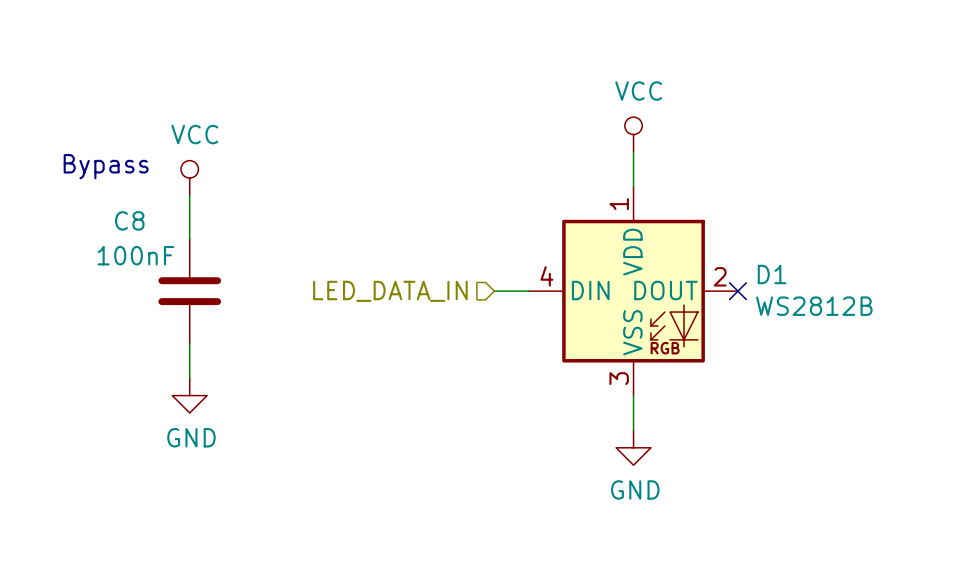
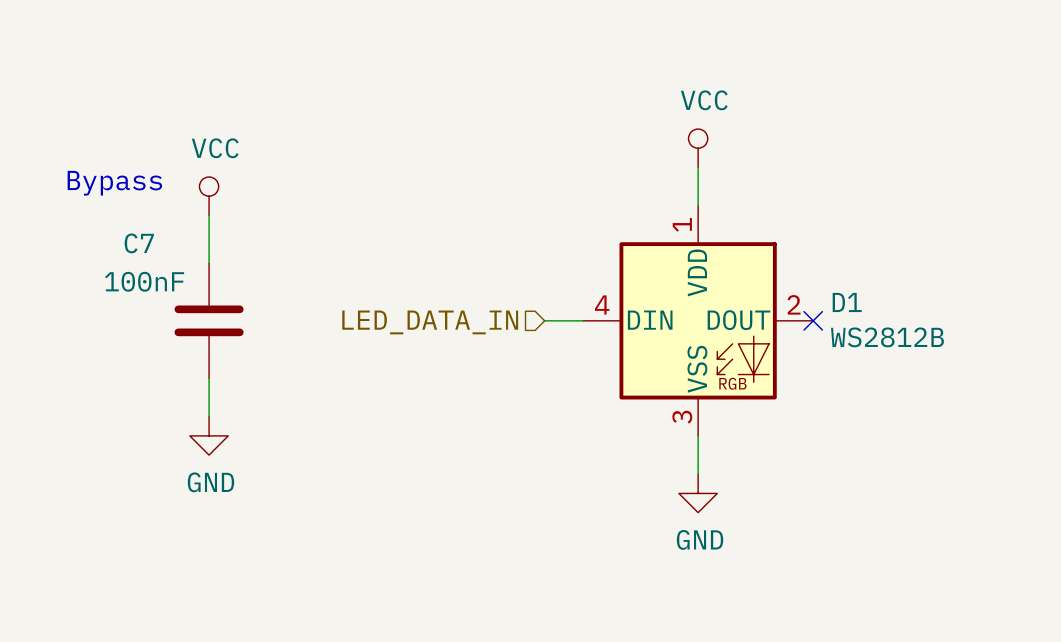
C8 name: C8 (129, 220) -> C7 (139, 243)

